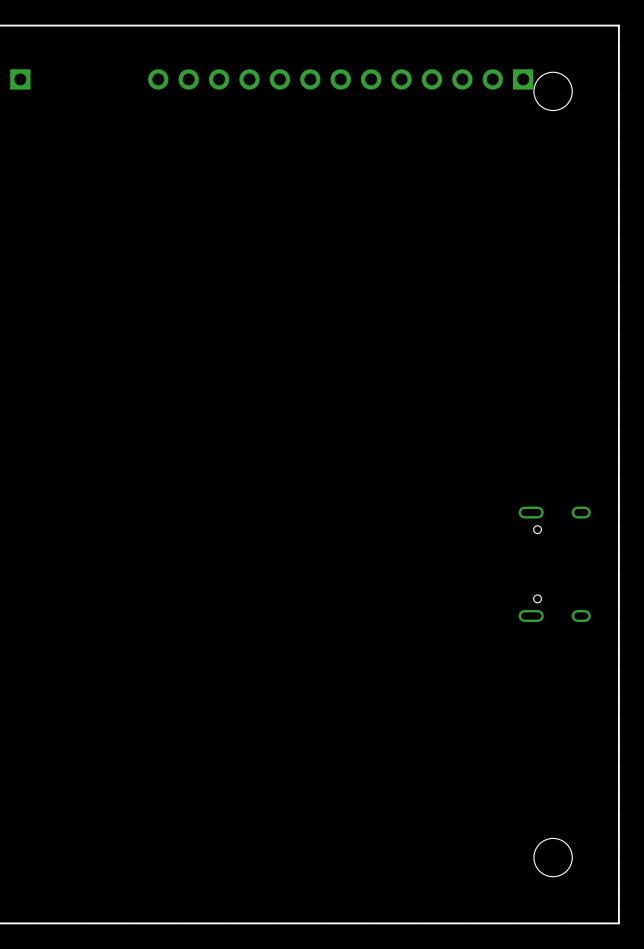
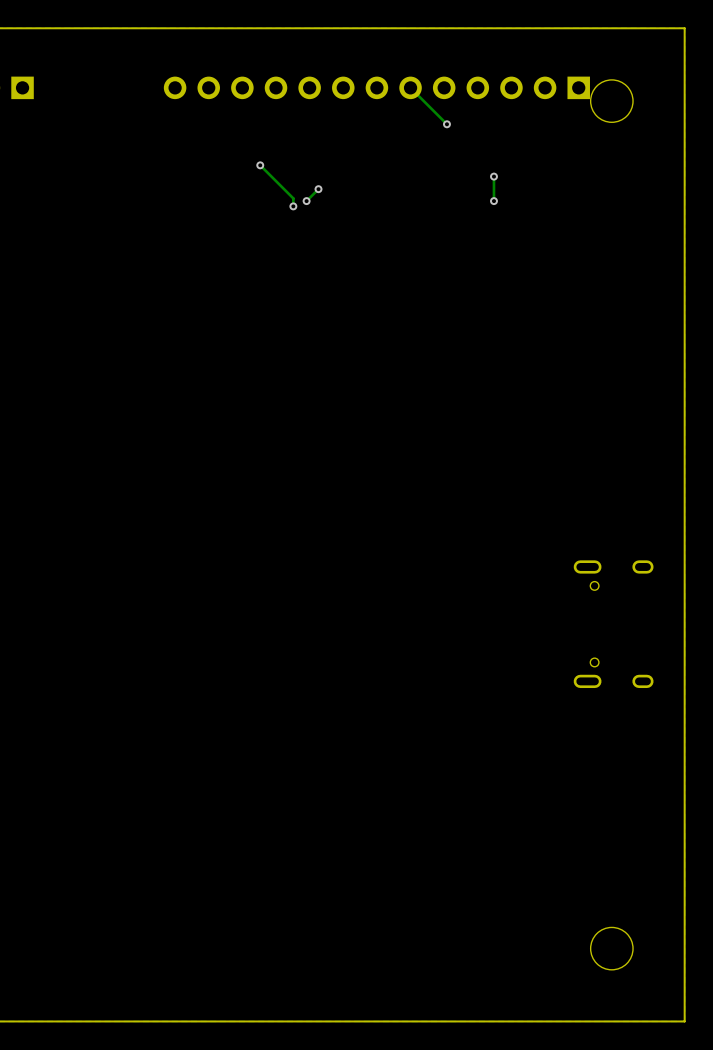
track: none -> (410, 87) (446, 124)
via: none -> (446, 124)
track: none -> (260, 165) (293, 198) (293, 206)
via: none -> (260, 165)
track: none -> (493, 176) (493, 201)
via: none -> (493, 176)
track: none -> (318, 189) (306, 201)
via: none -> (318, 189)
via: none -> (306, 201)
via: none -> (493, 201)
via: none -> (293, 206)

